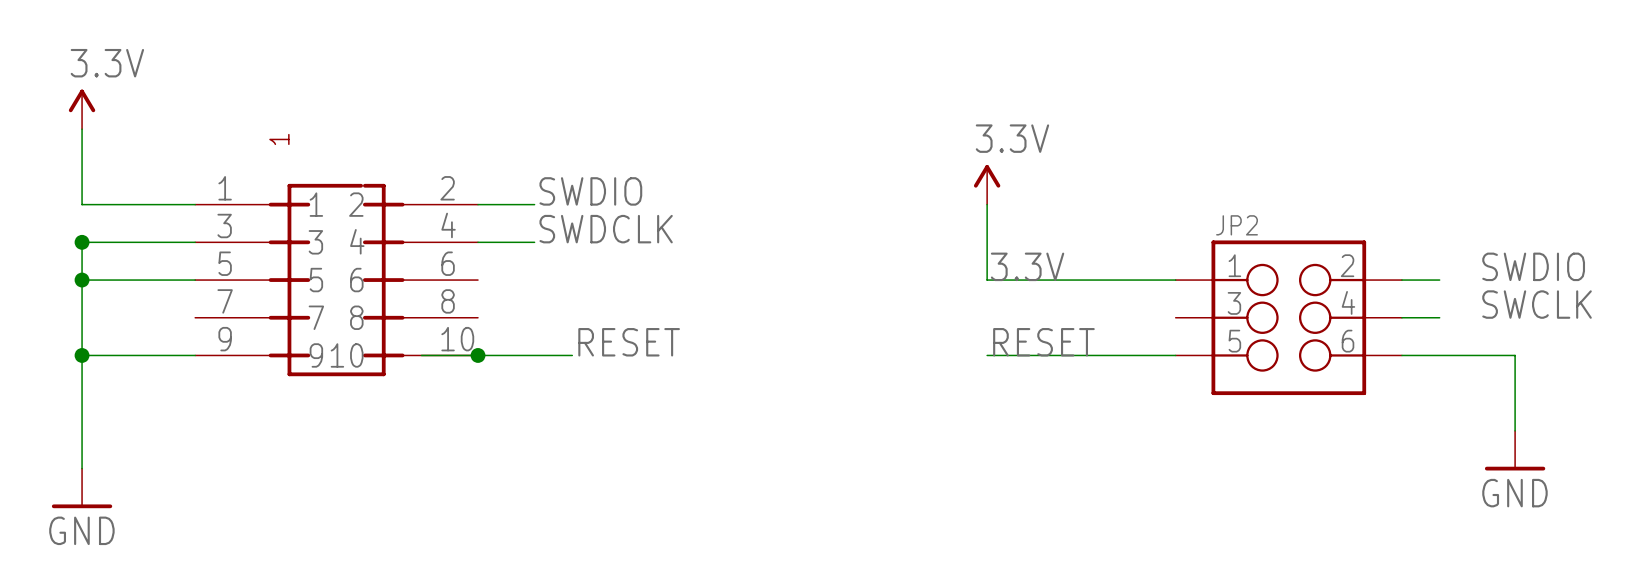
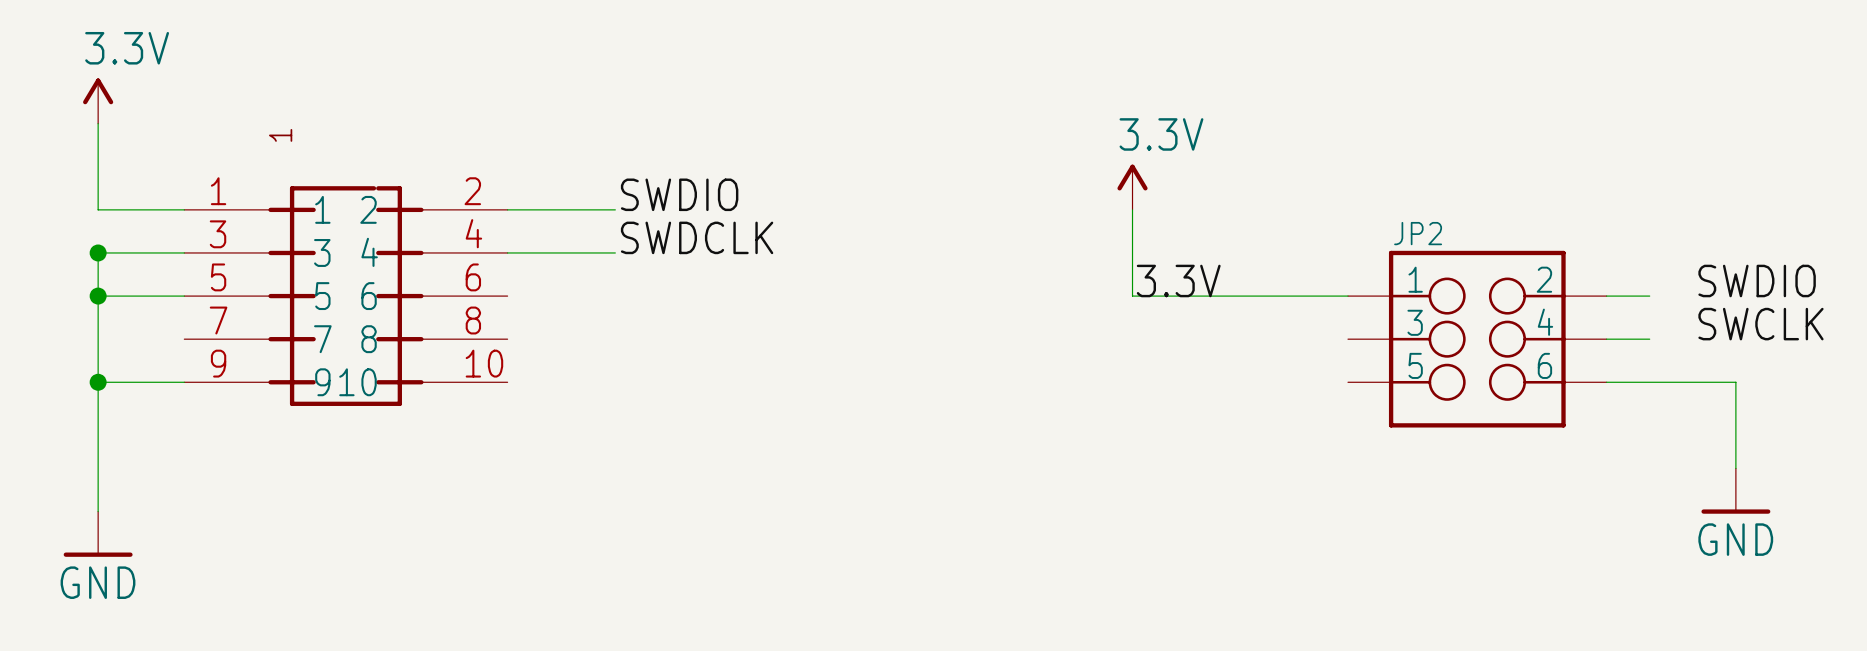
part position: (336, 280) -> (345, 296)
label: RESET (629, 342) -> none
label: RESET (1043, 342) -> none
wire: (421, 355) (572, 355) -> none
junction: (478, 355) -> none
wire: (987, 355) (1175, 355) -> none

